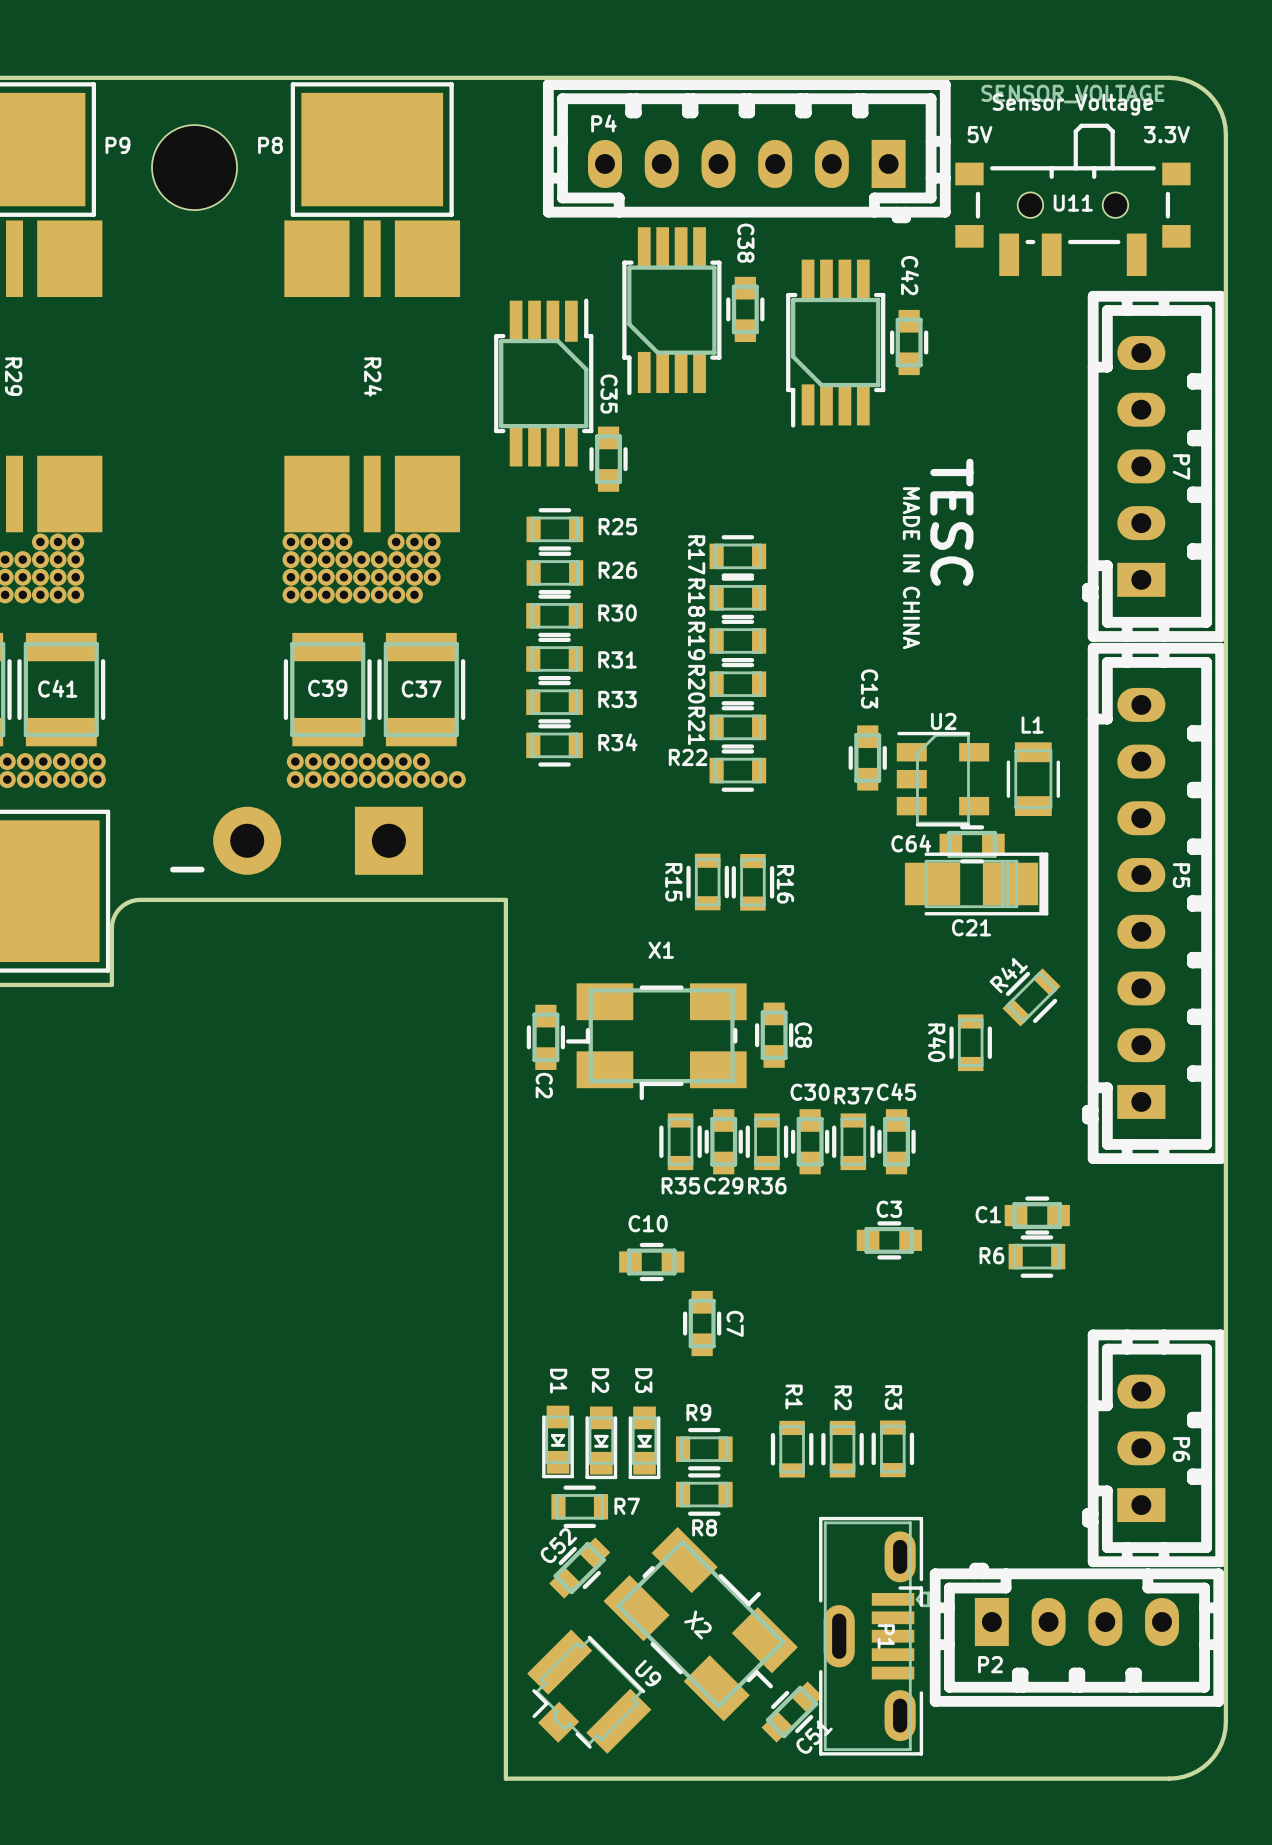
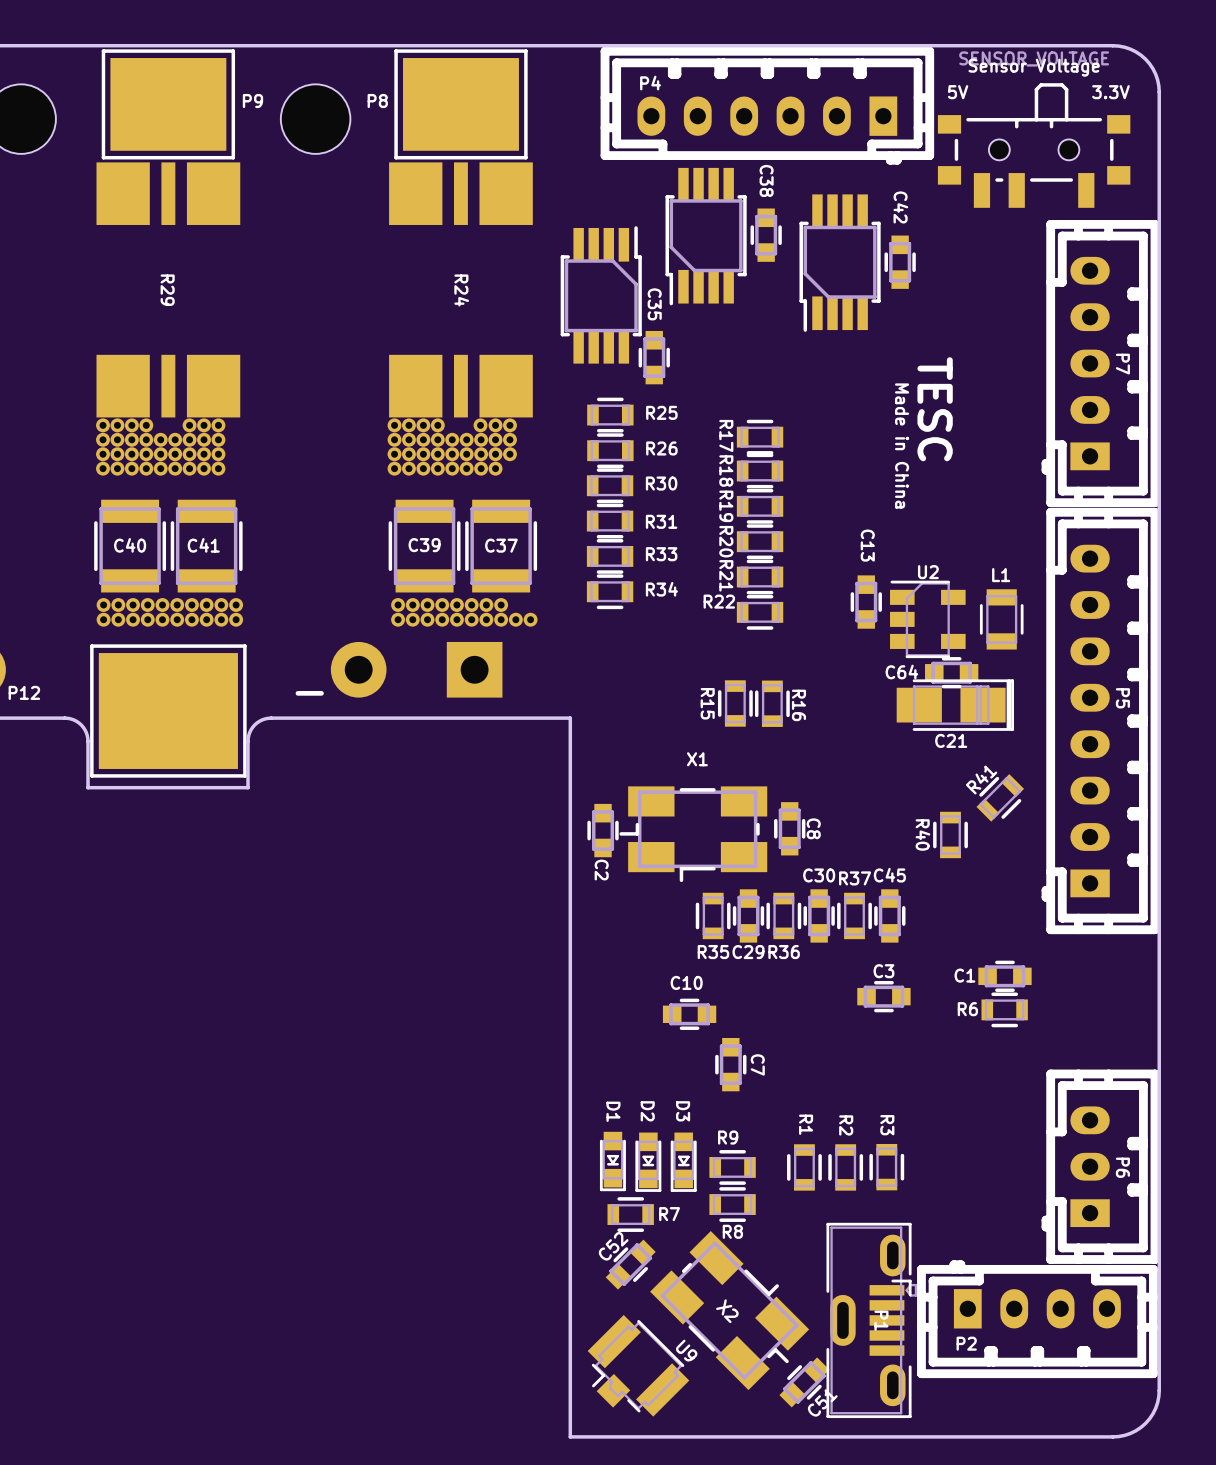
U11 name: U11 (1073, 203) -> Sensor Voltage (1034, 67)
text: MADE IN CHINA (911, 568) -> Made in China (902, 445)

